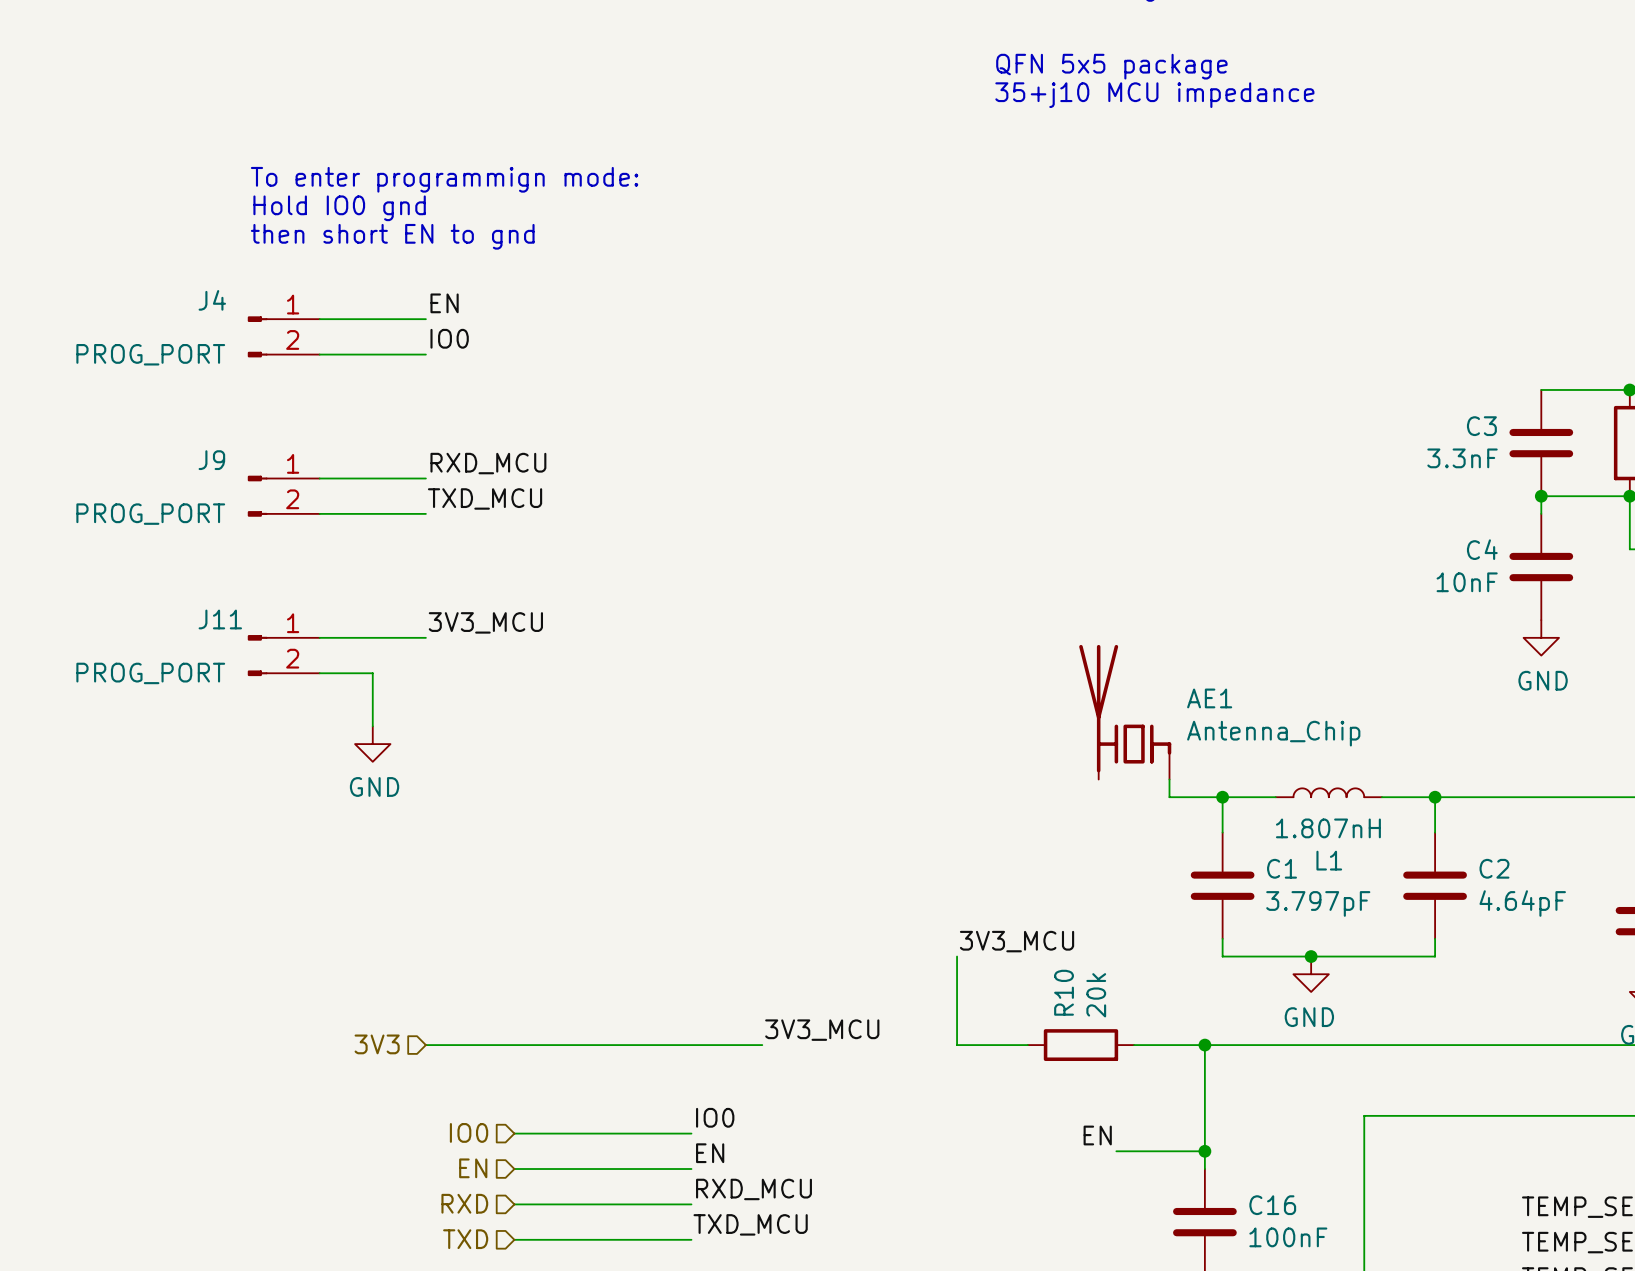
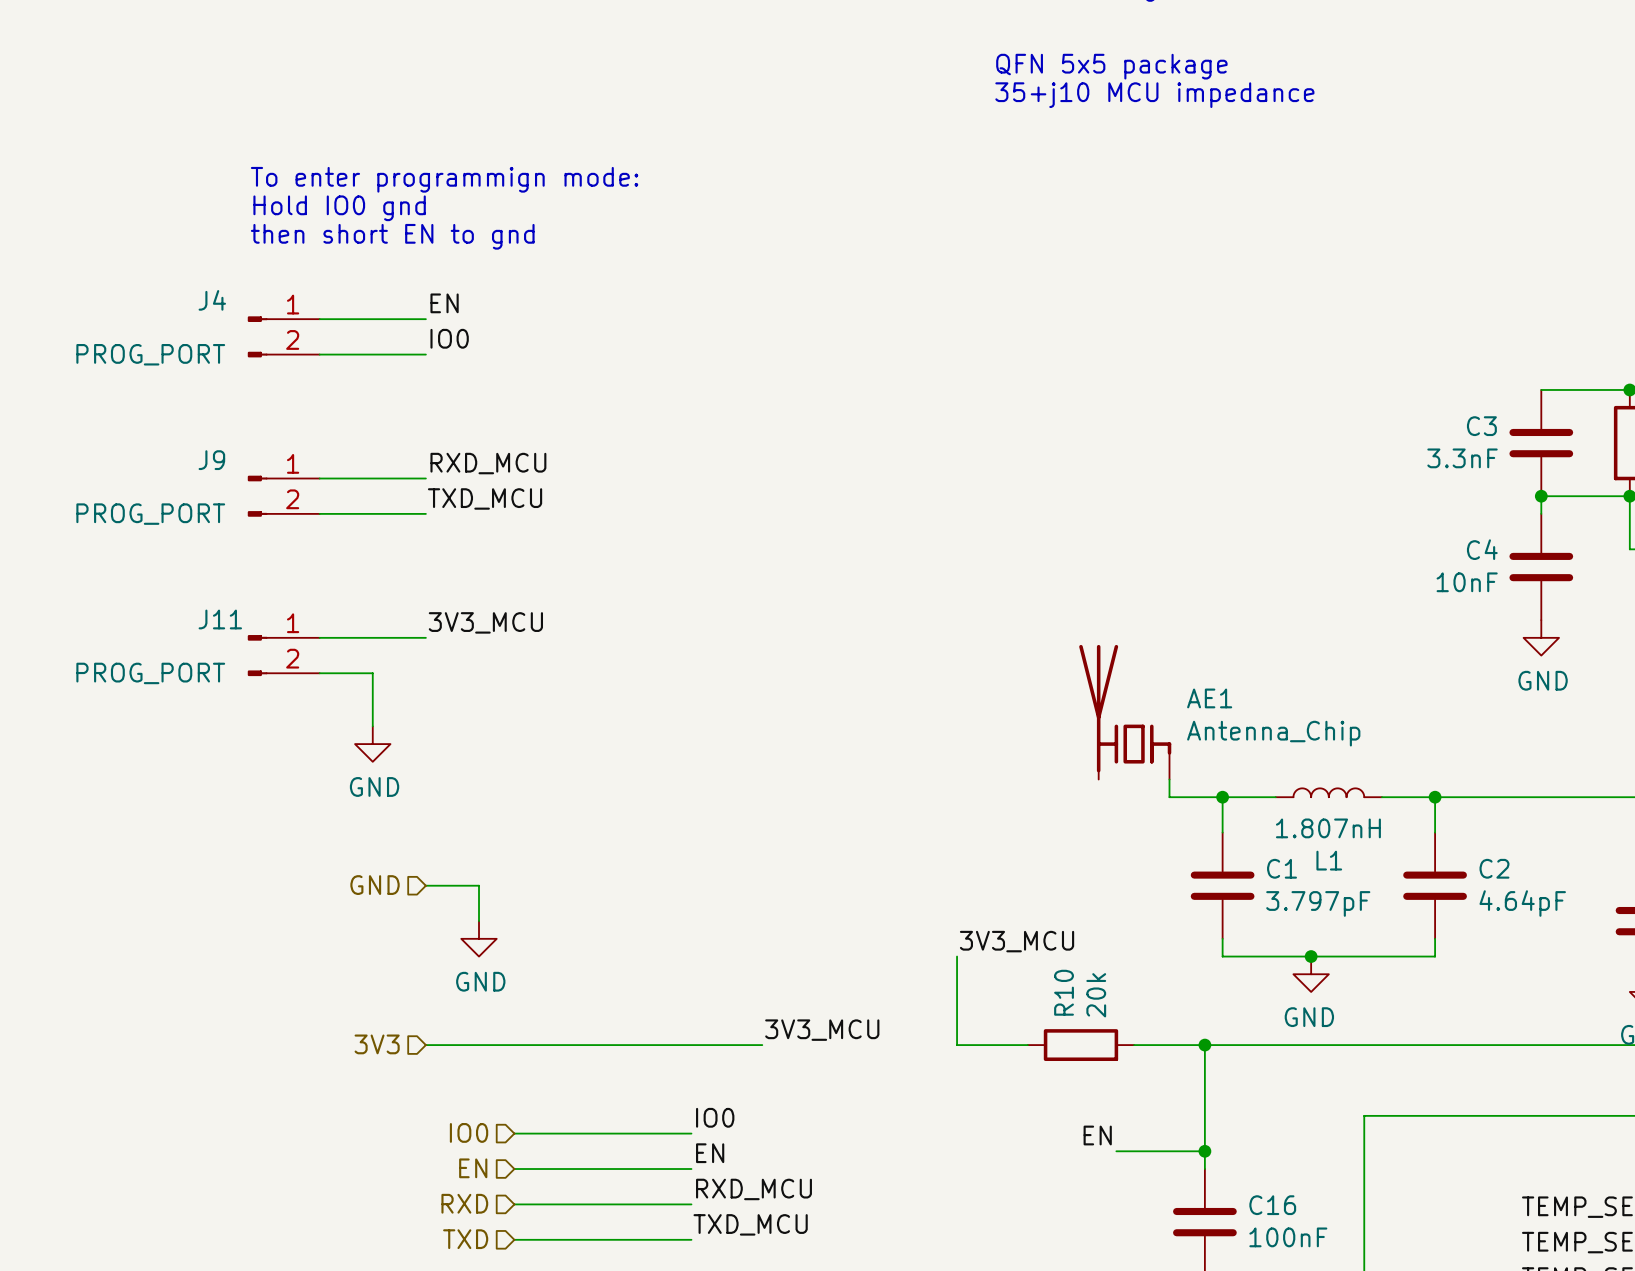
hierarchical label: none -> GND (375, 885)
wire: none -> (425, 885) (479, 885) (479, 921)
power symbol: none -> GND (479, 938)

